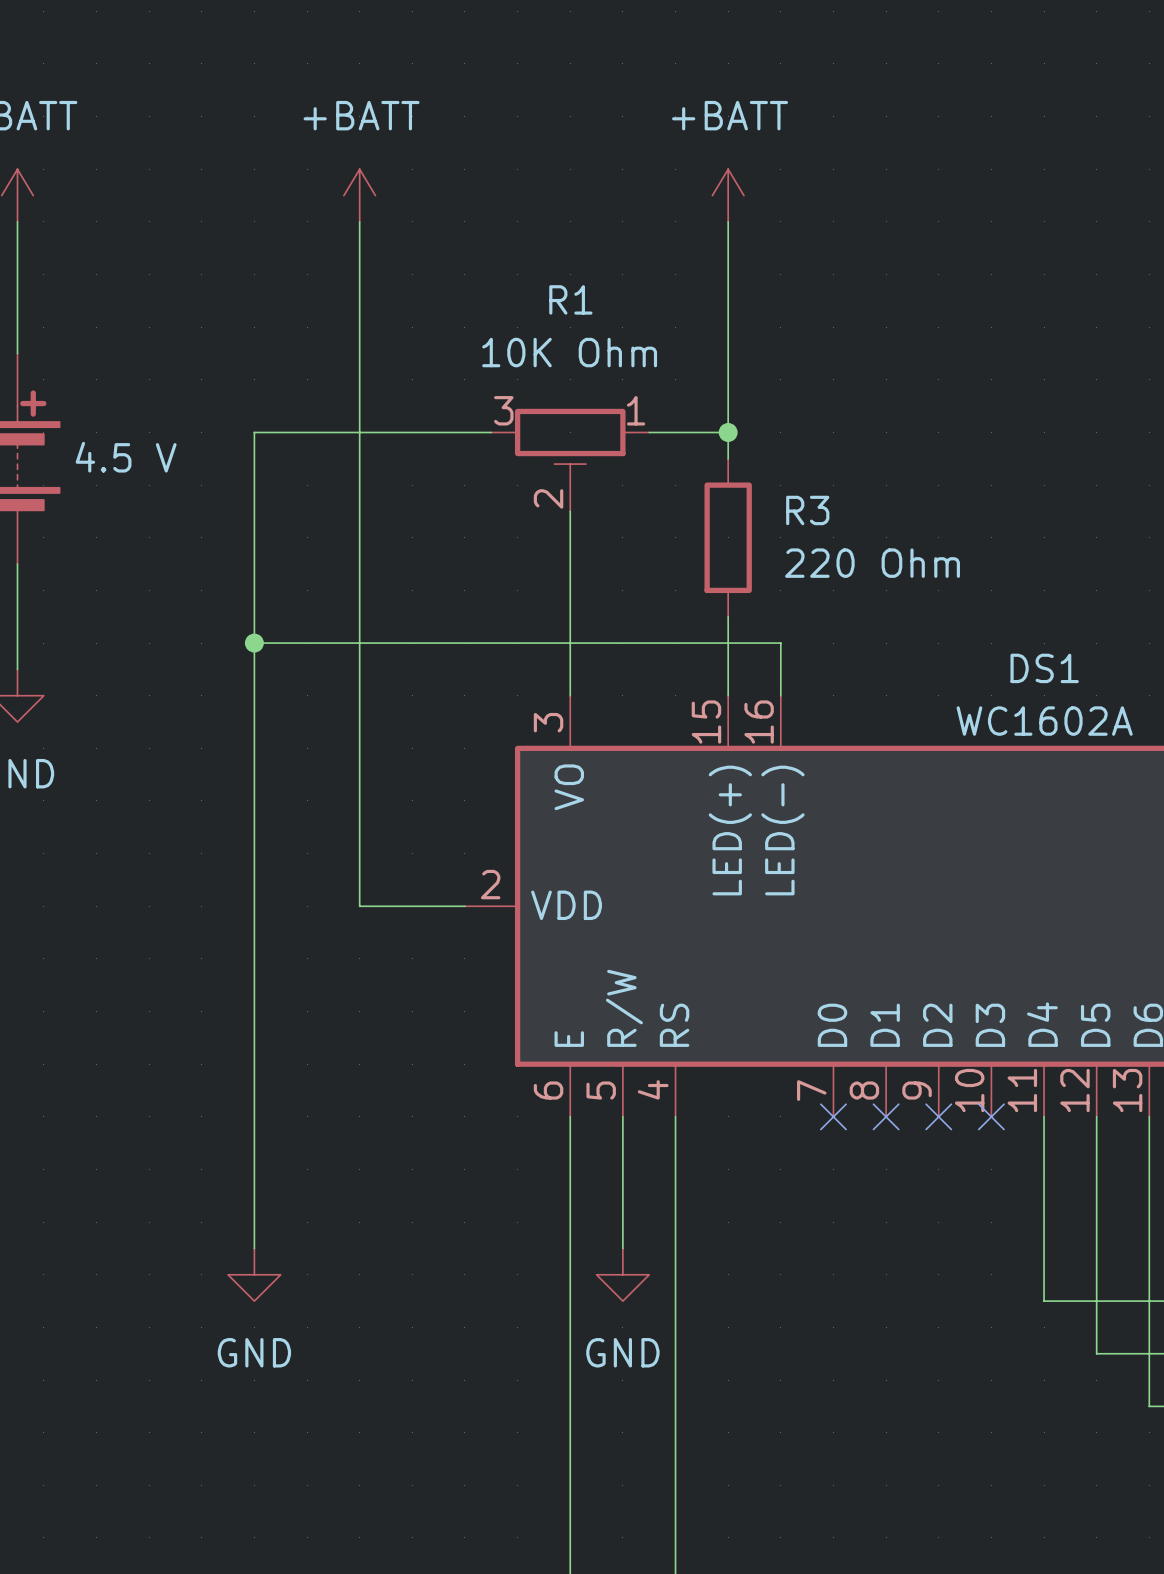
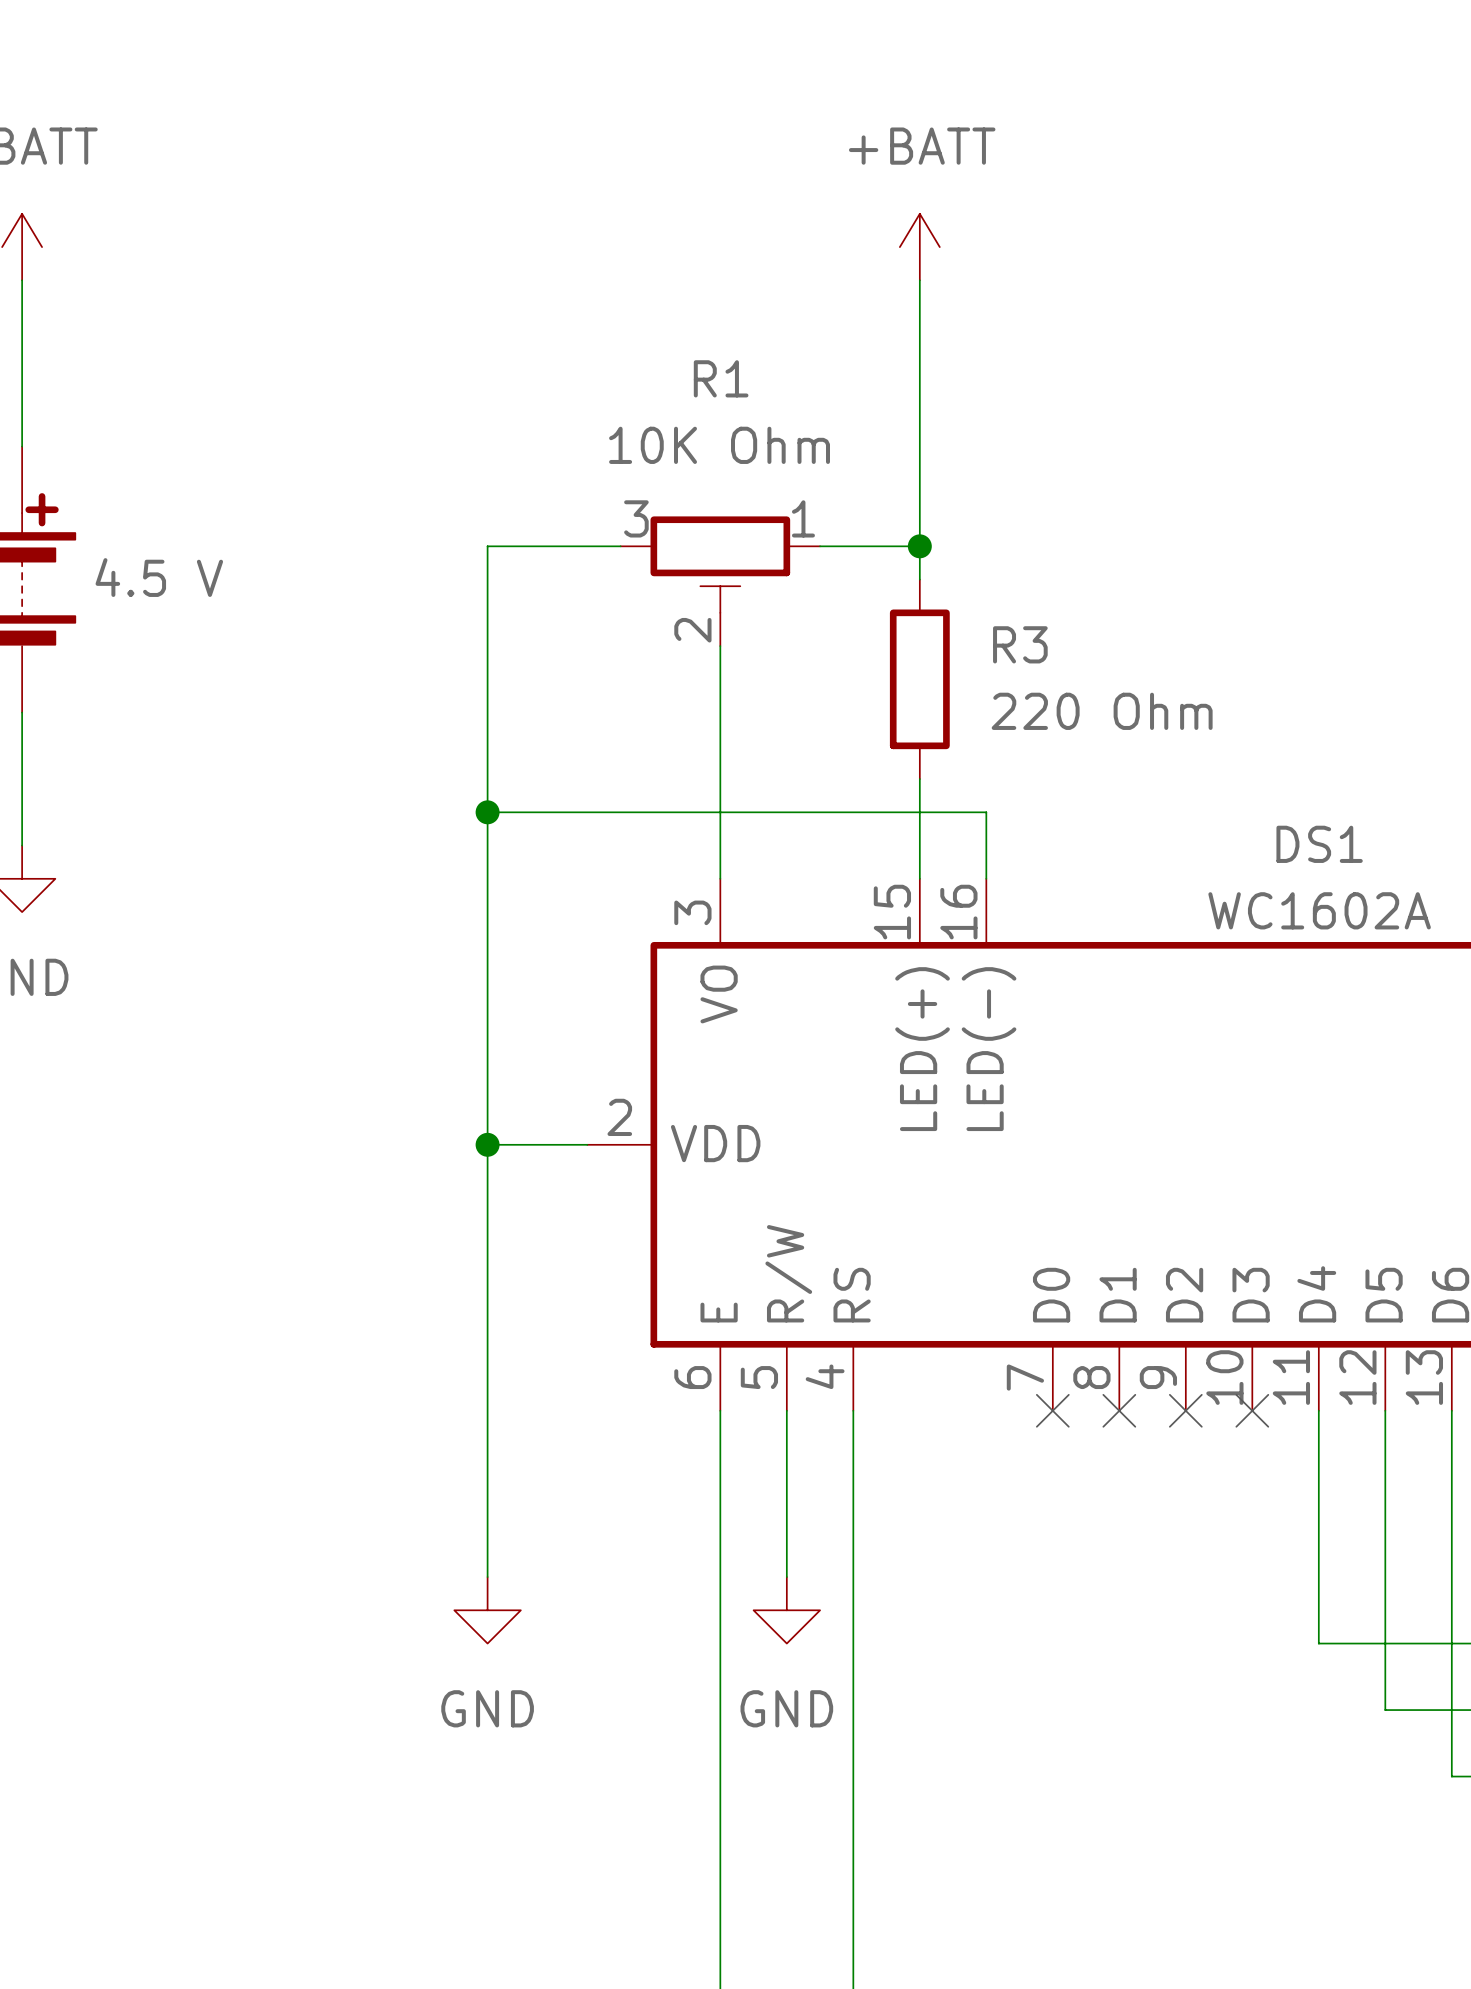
power symbol: +BATT (359, 195) -> none
wire: (359, 221) (359, 906) (385, 906) -> none
wire: (385, 432) (254, 432) (254, 1248) -> (487, 546) (487, 1577)
wire: (254, 643) (385, 643) -> none
junction: (254, 643) -> none
junction: none -> (487, 812)
junction: none -> (487, 1144)
power symbol position: GND (254, 1274) -> GND (487, 1610)

